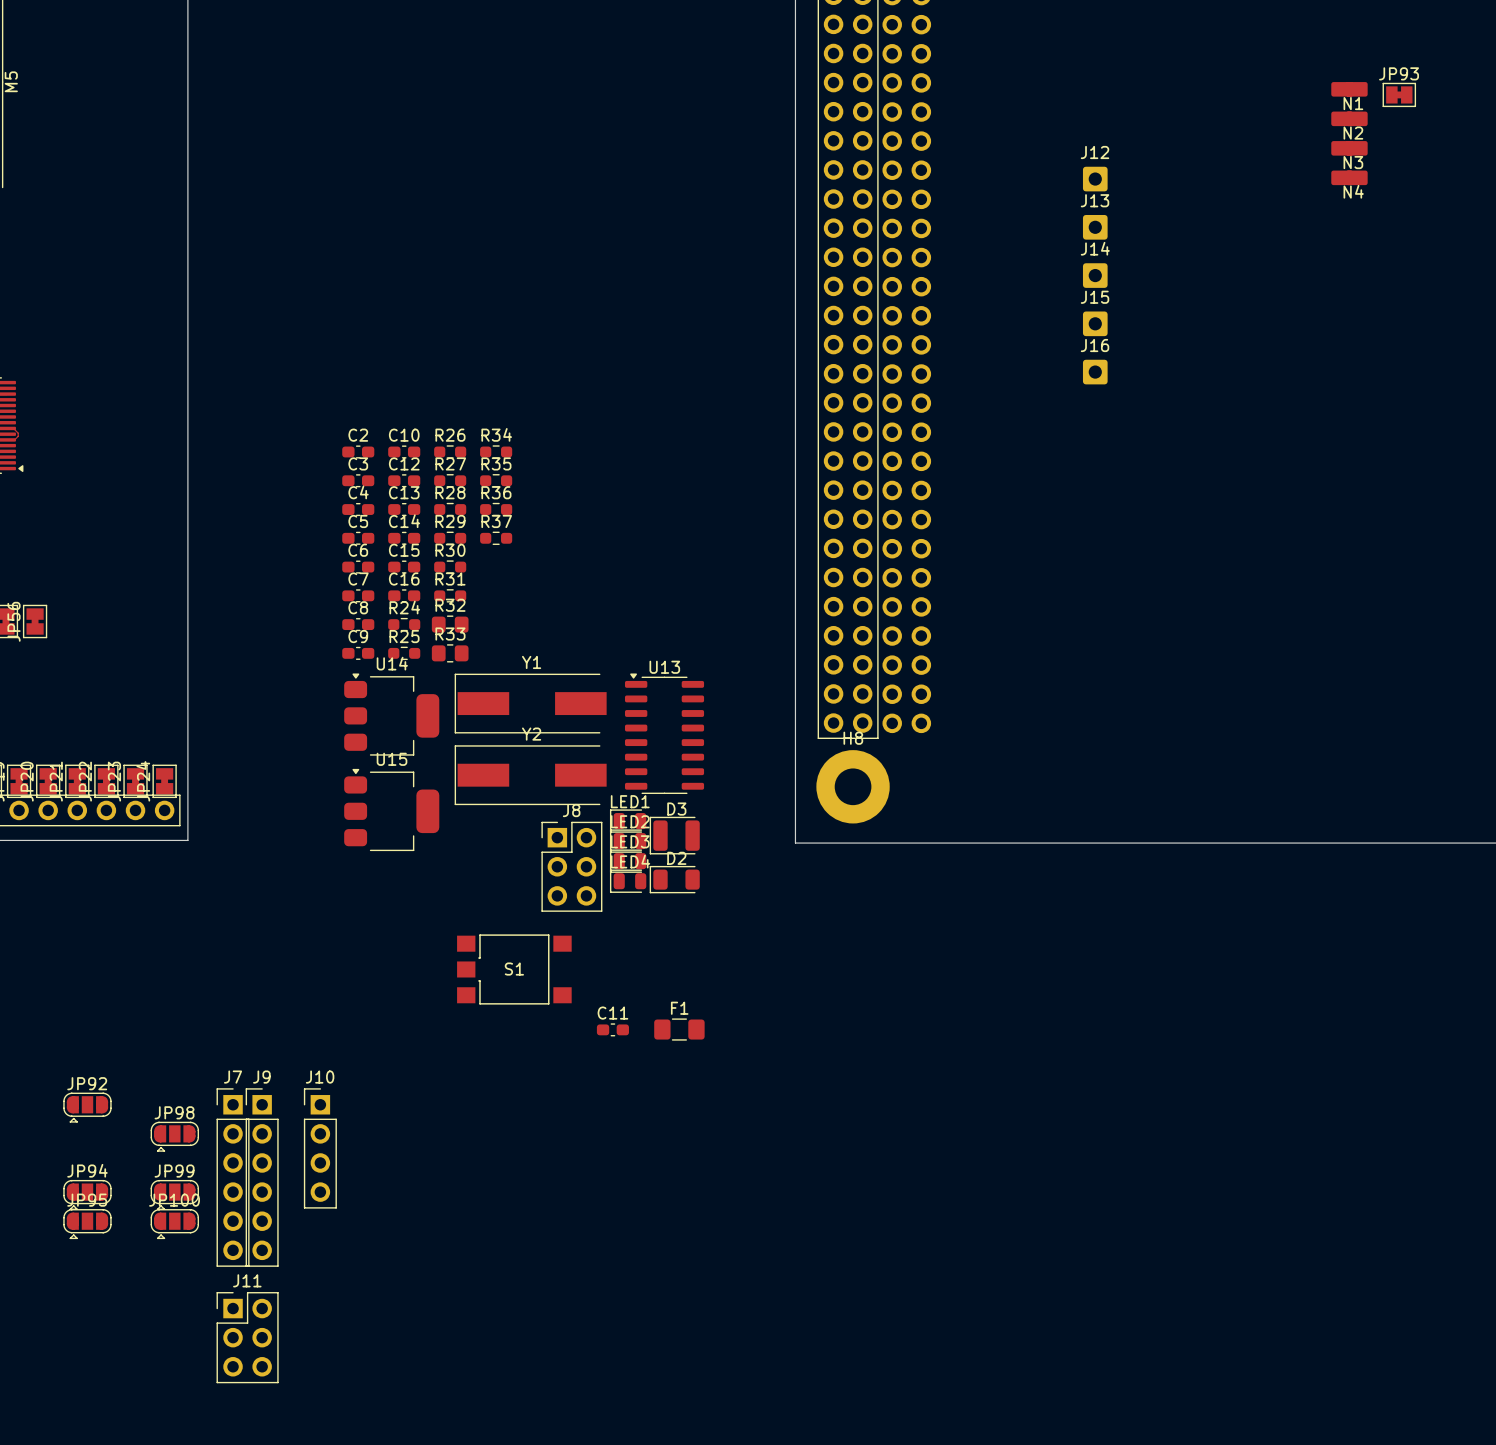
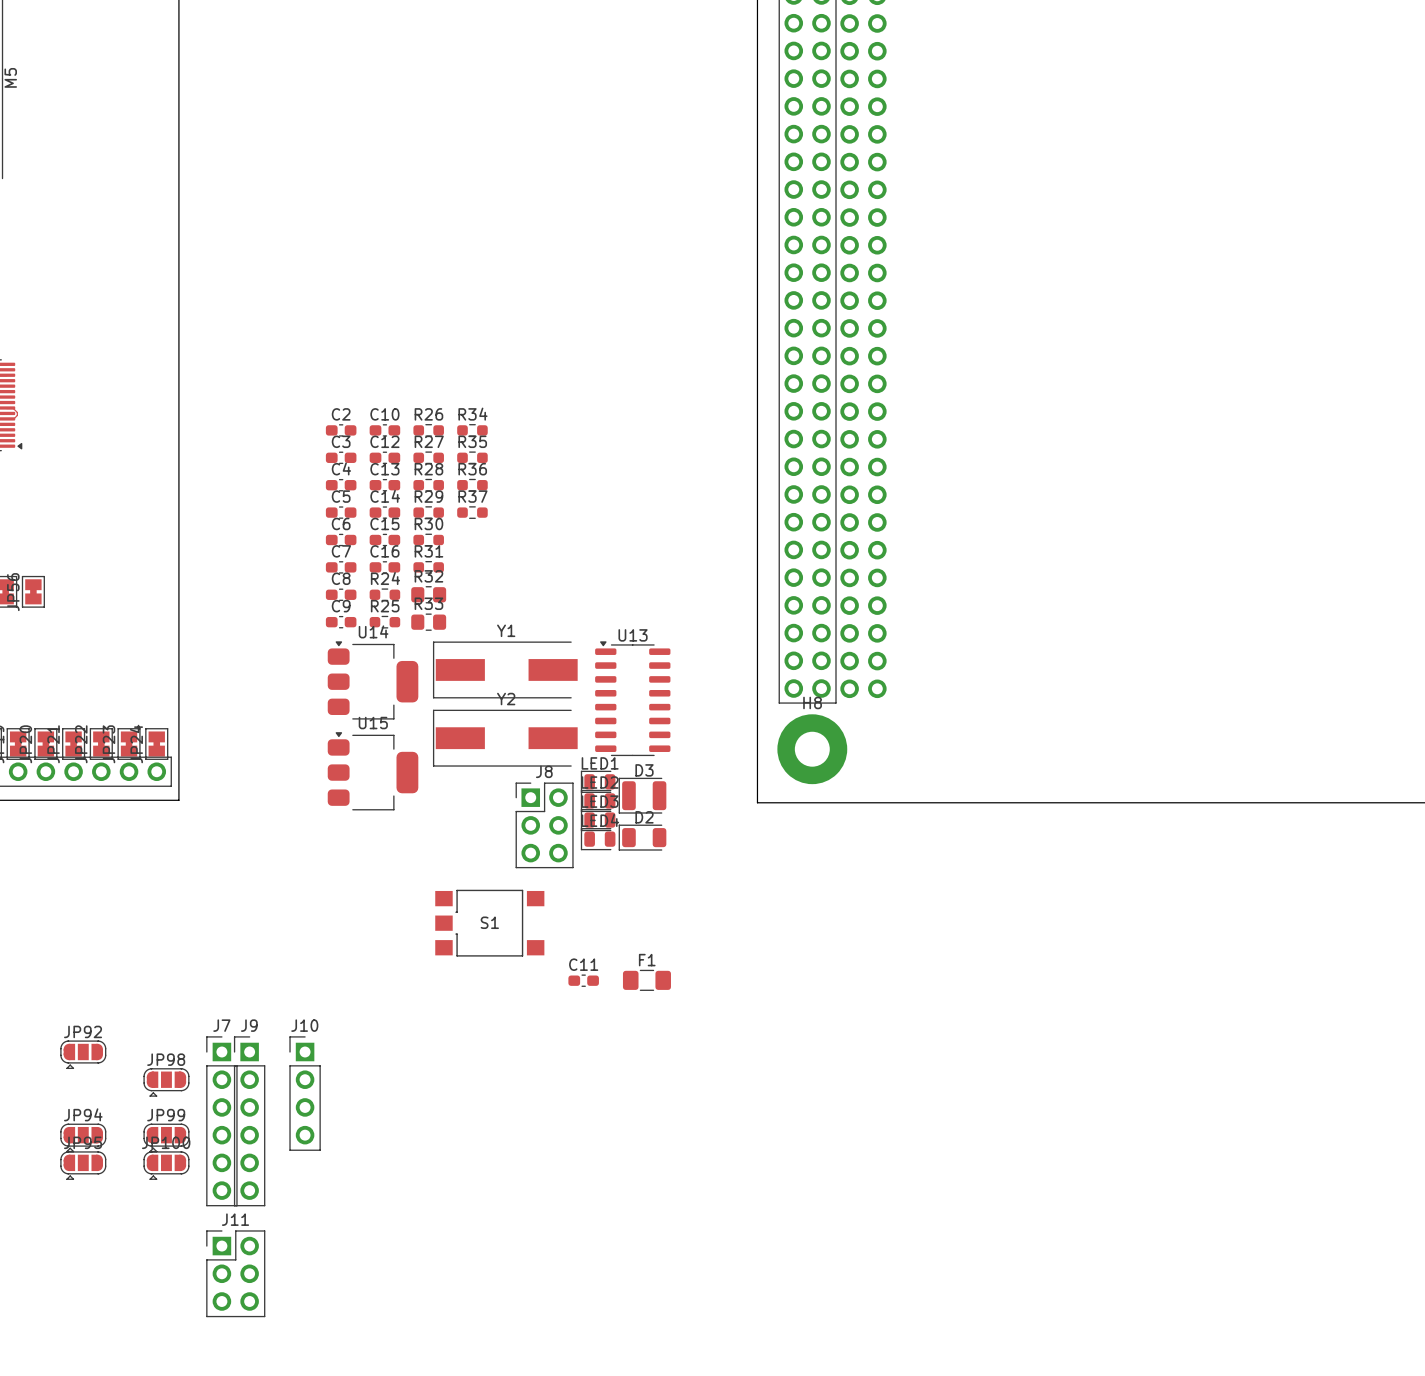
N1: (1349, 89) -> none
JP93: (1399, 94) -> none
N2: (1349, 118) -> none
N3: (1349, 148) -> none
N4: (1349, 177) -> none
J12: (1095, 179) -> none
J13: (1095, 227) -> none
J14: (1095, 275) -> none
J15: (1095, 323) -> none
J16: (1095, 372) -> none

